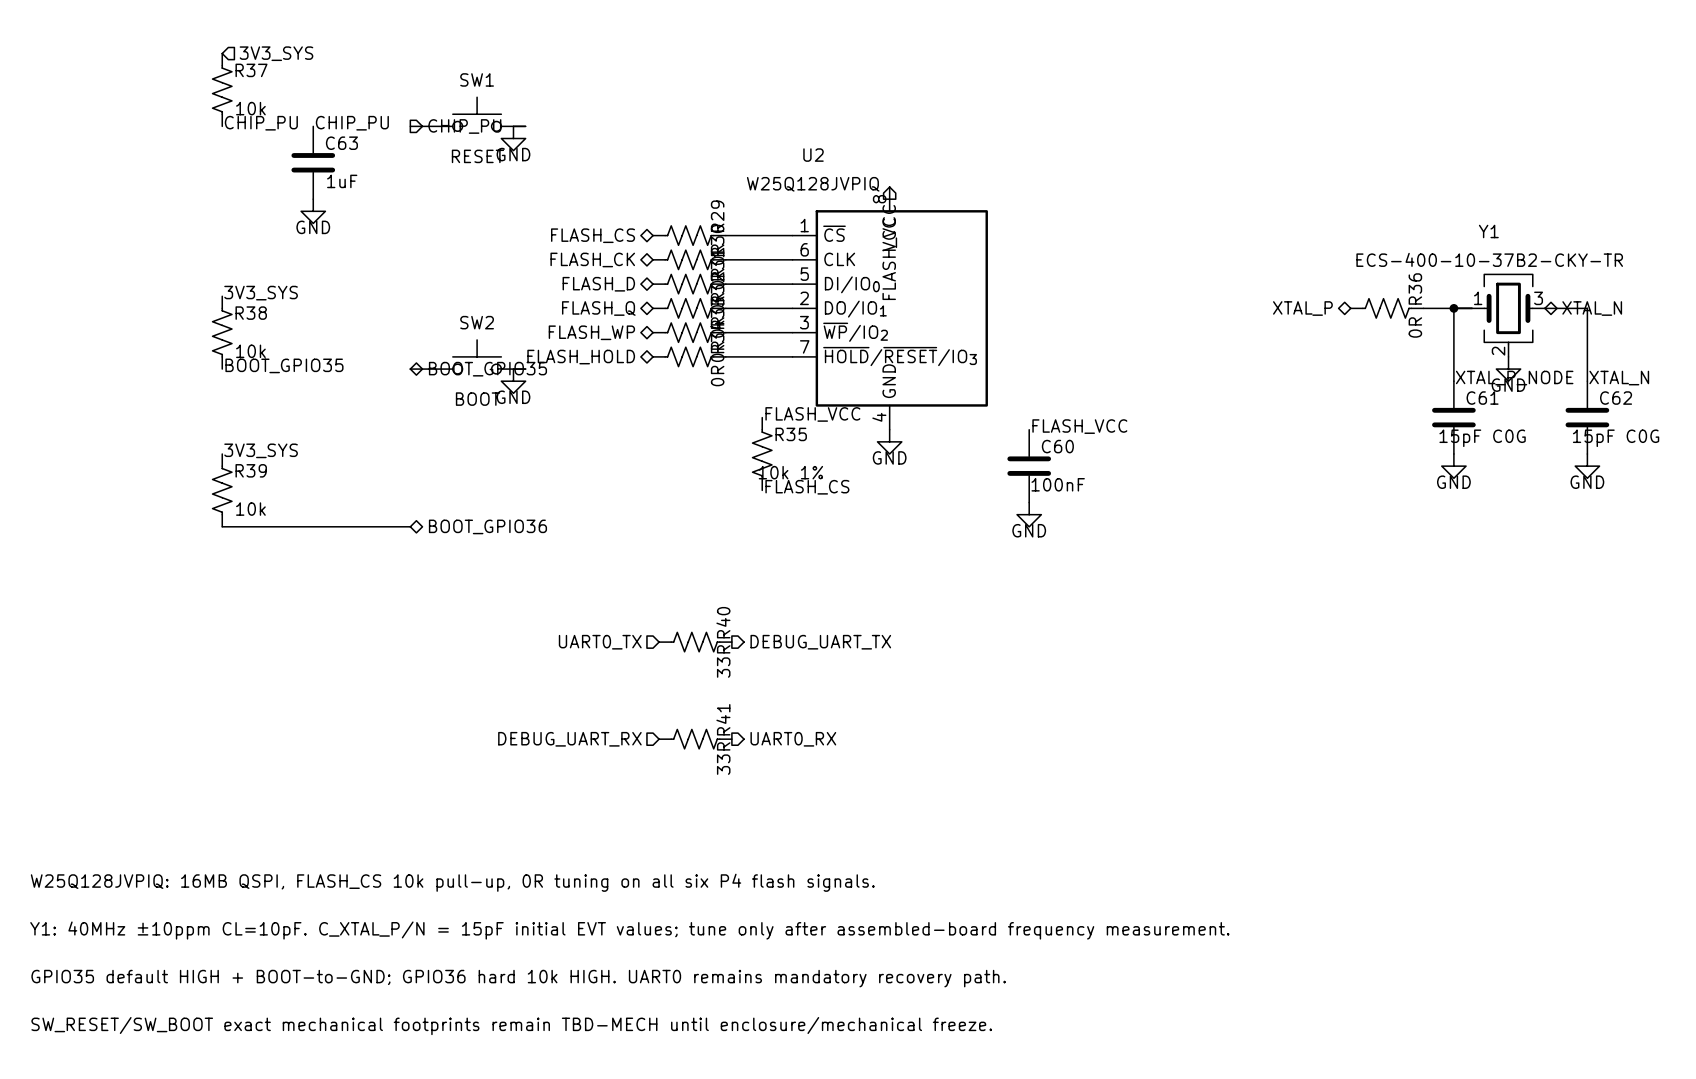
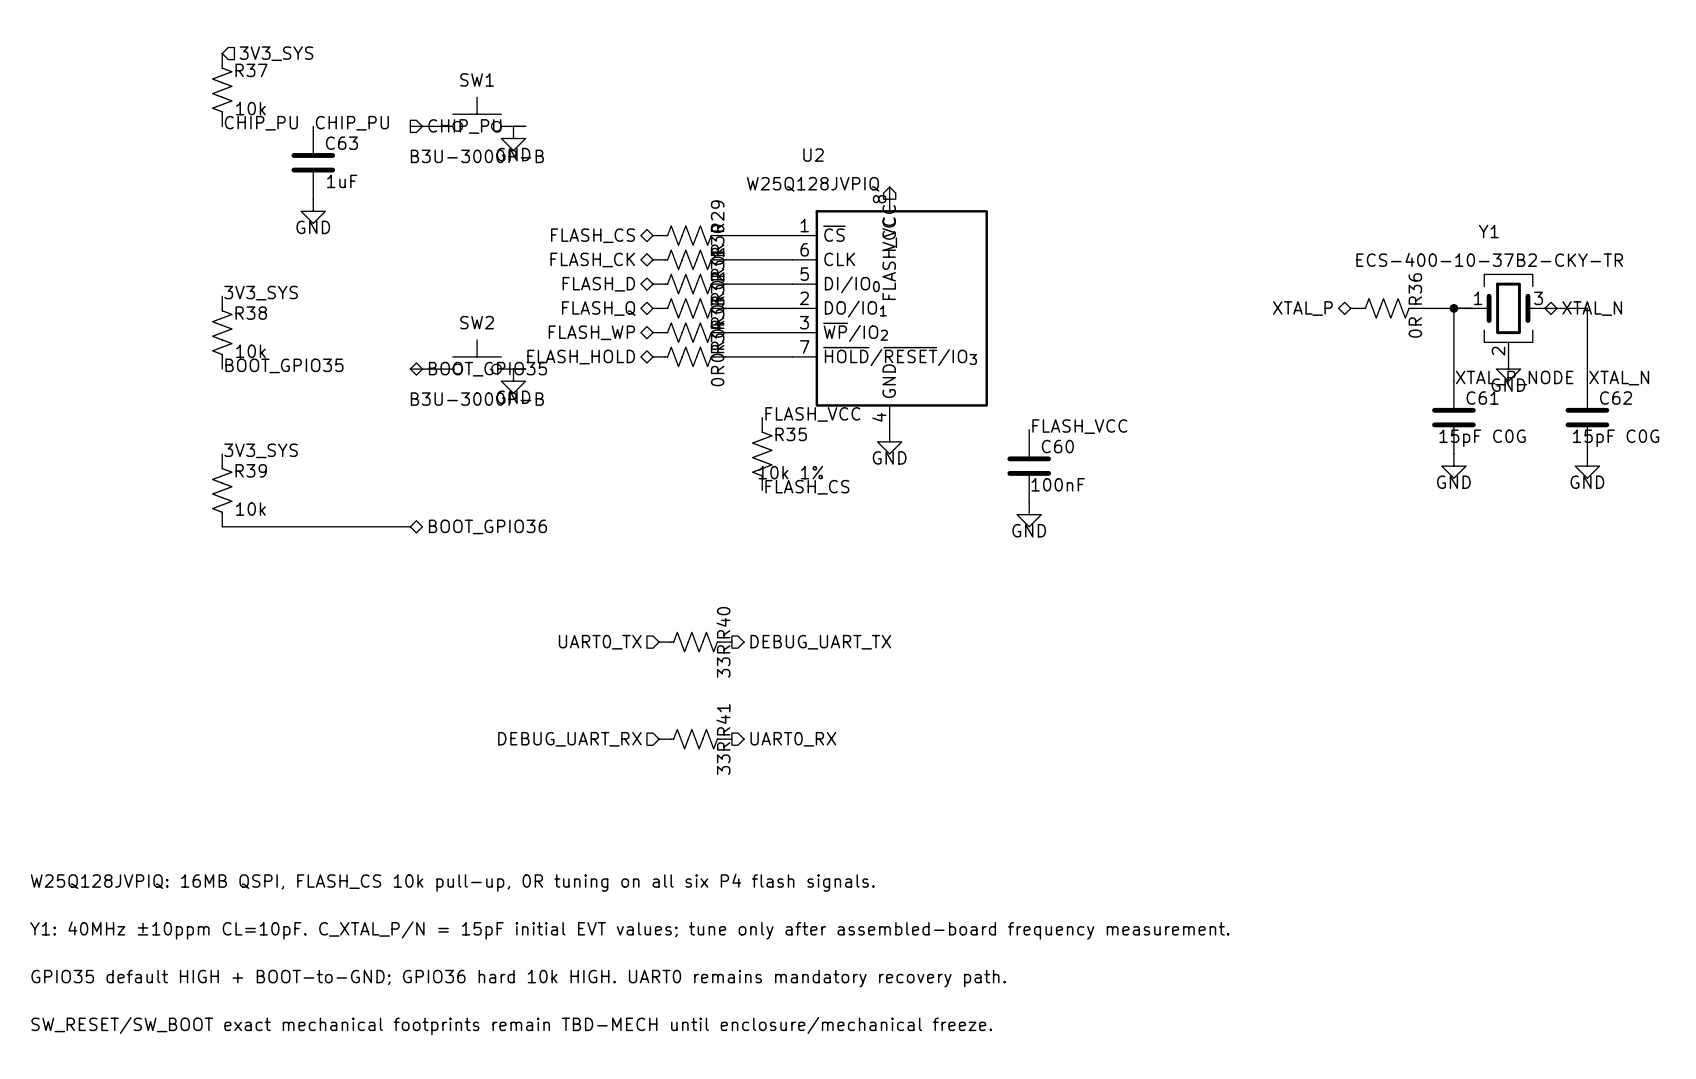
SW1 value: RESET (477, 156) -> B3U-3000P-B (477, 156)
SW2 value: BOOT (477, 399) -> B3U-3000P-B (477, 399)

